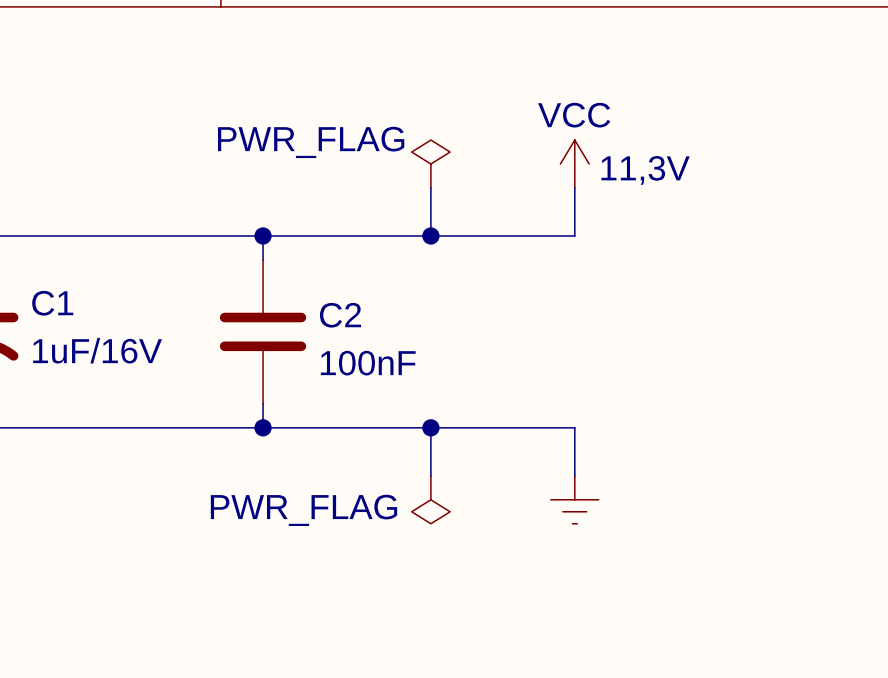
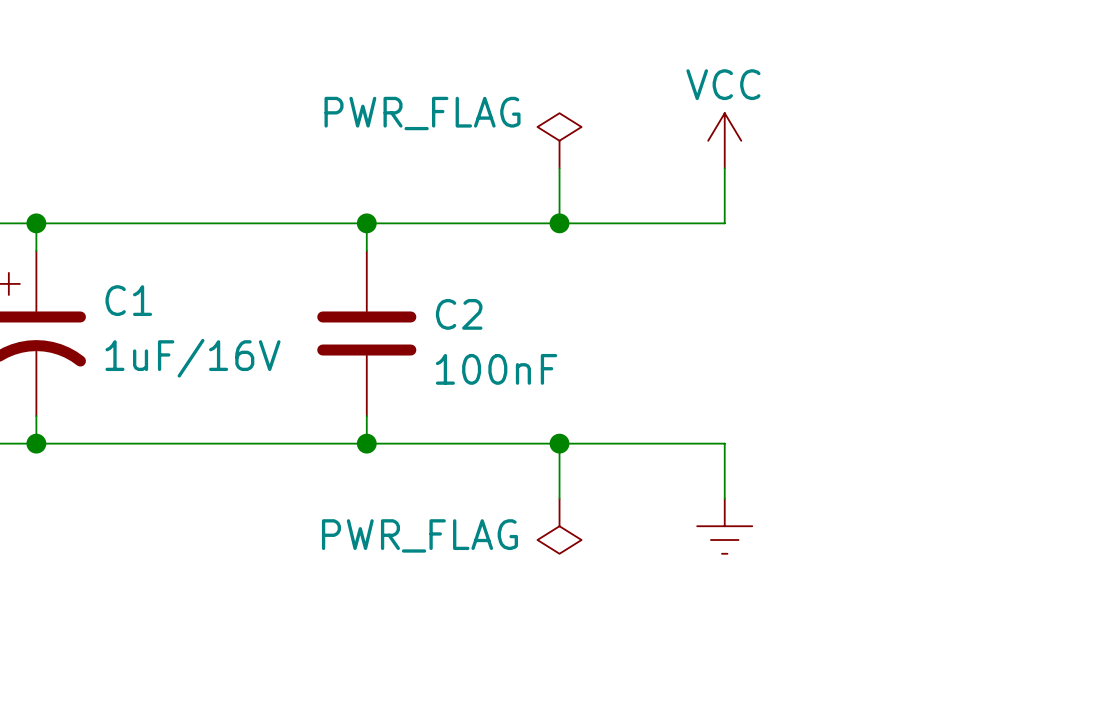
text: 11,3V (645, 170) -> none

